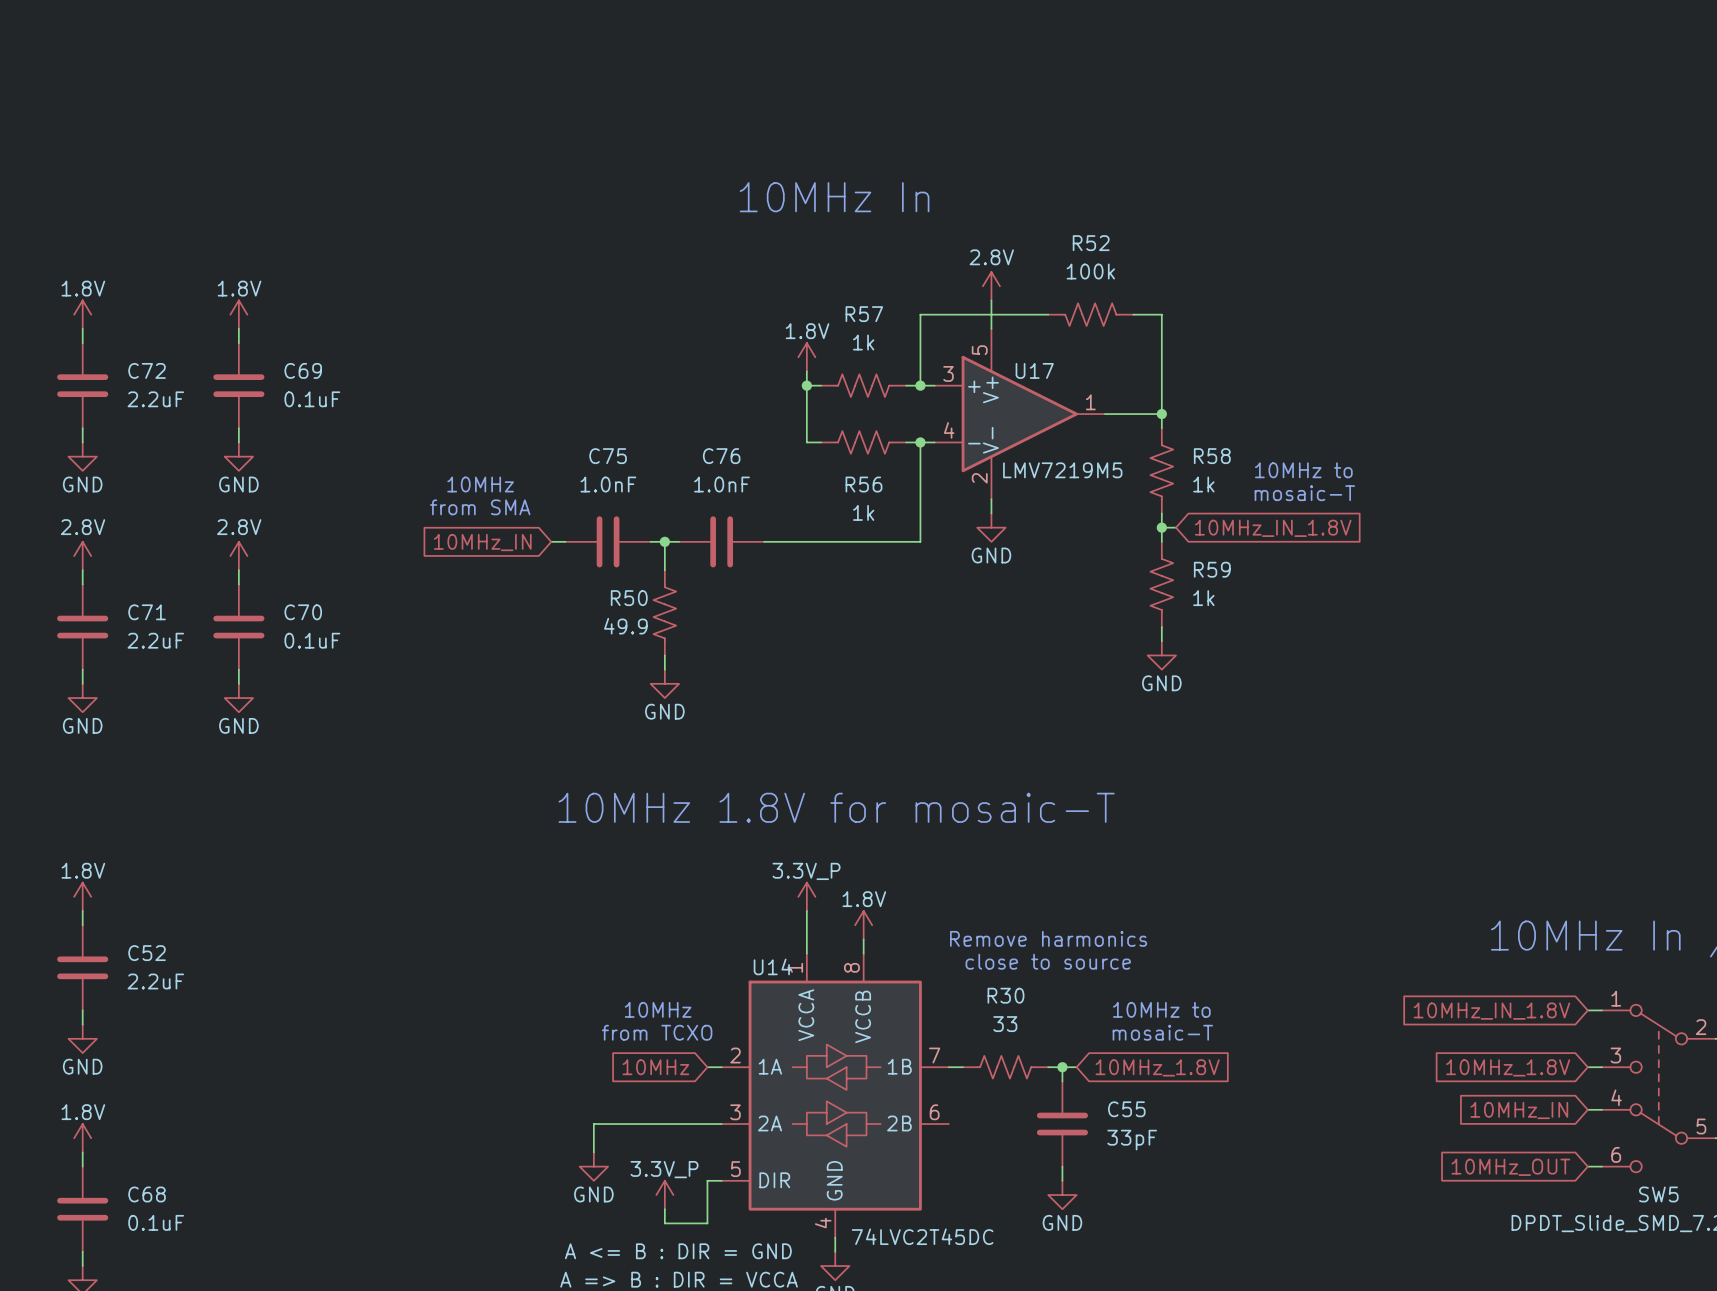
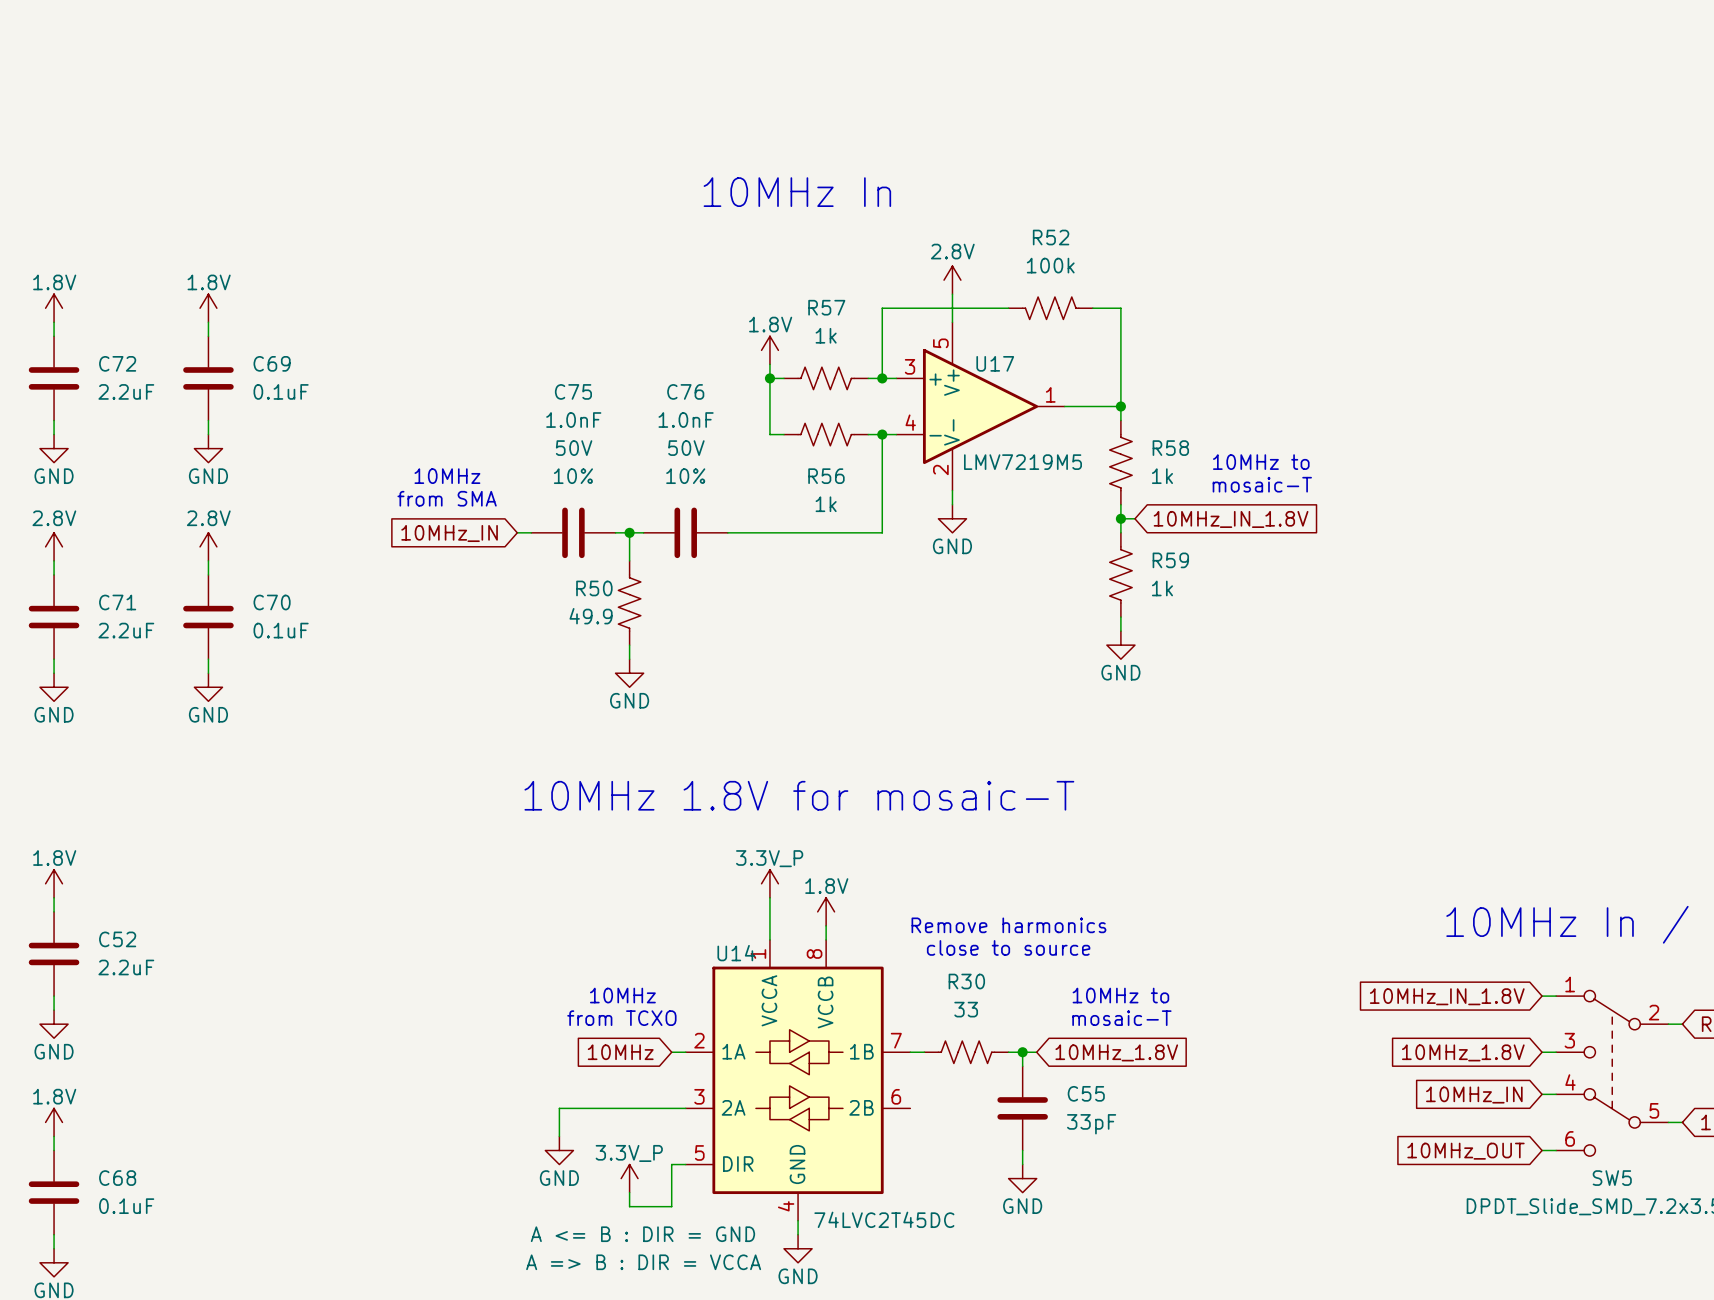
C75 text: none -> 50V (574, 448)
C75 name position: C75 (608, 456) -> C75 (573, 391)
C76 name position: C76 (721, 456) -> C76 (685, 391)
C76 text: none -> 50V (686, 448)
C75 text: none -> 10% (573, 476)
C75 value position: 1.0nF (608, 484) -> 1.0nF (573, 420)
C76 text: none -> 10% (685, 476)
C76 value position: 1.0nF (721, 484) -> 1.0nF (686, 420)

